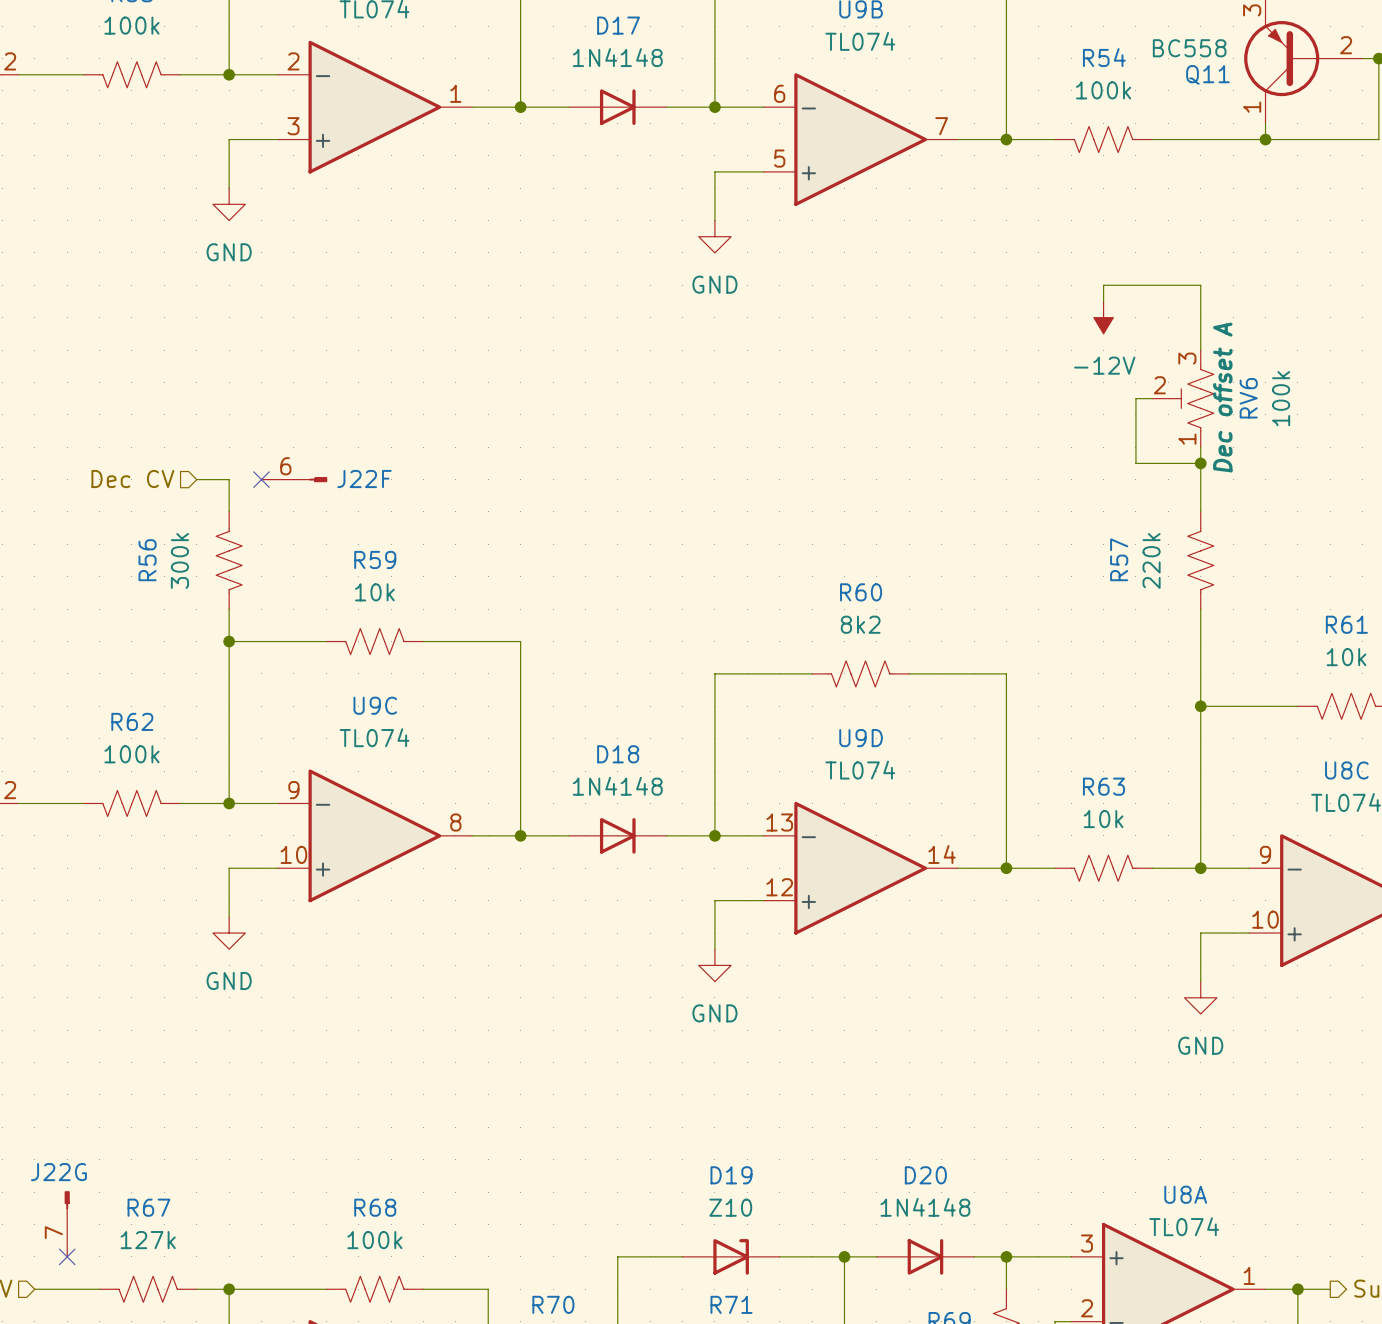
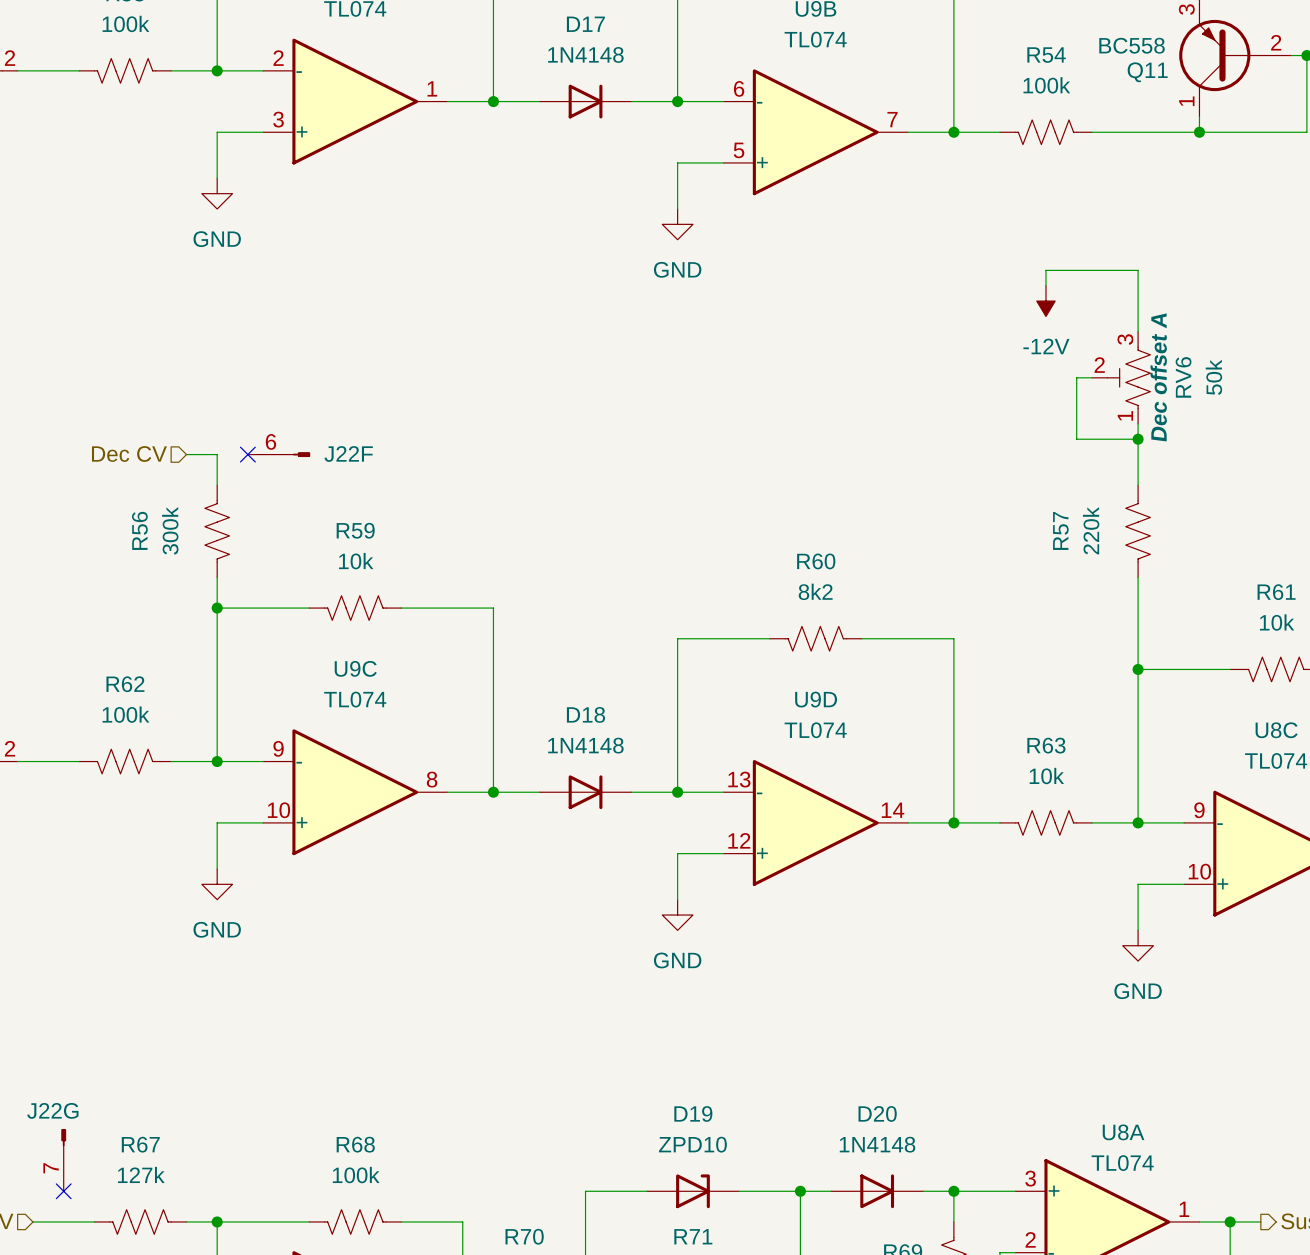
RV6 value: 100k (1281, 398) -> 50k (1213, 377)
D19 value: Z10 (730, 1207) -> ZPD10 (692, 1144)

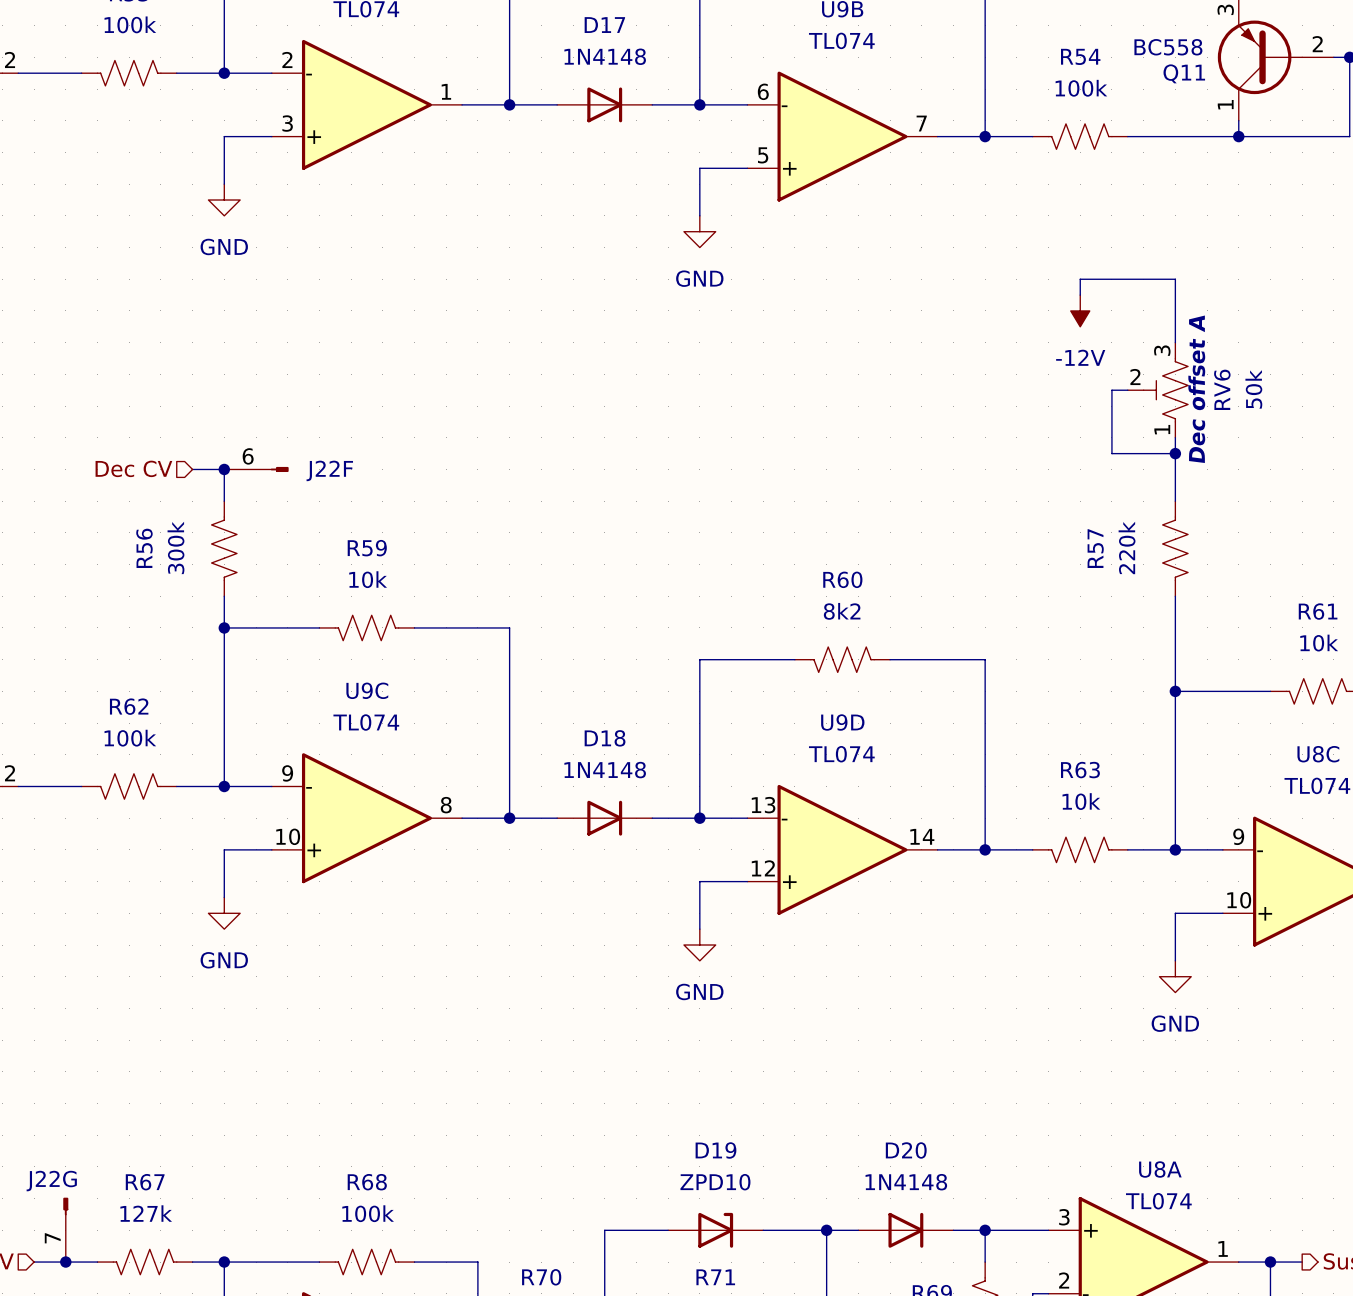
junction: none -> (224, 469)
no-connect mark: (247, 454) -> none
J22F position: (279, 454) -> (256, 469)
J22G position: (63, 1160) -> (65, 1229)
no-connect mark: (63, 1191) -> none
junction: none -> (65, 1262)

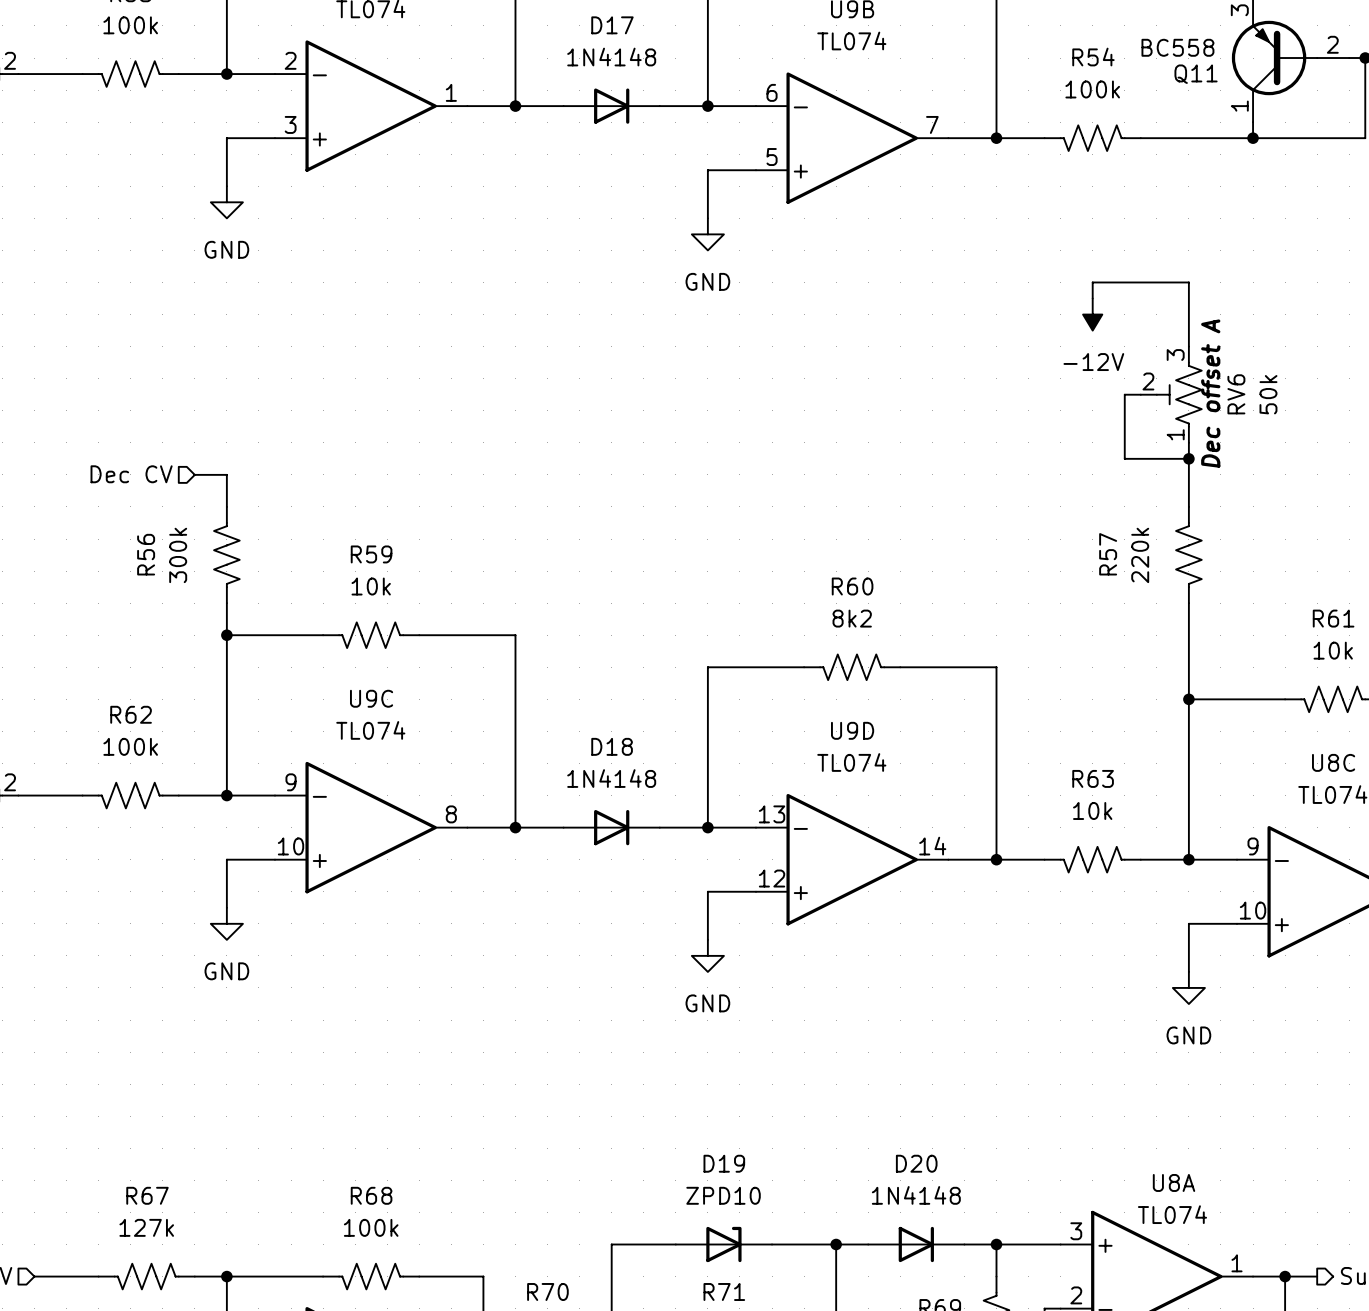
junction: (224, 469) -> none
J22F: (256, 469) -> none
J22G: (65, 1229) -> none
junction: (65, 1262) -> none

